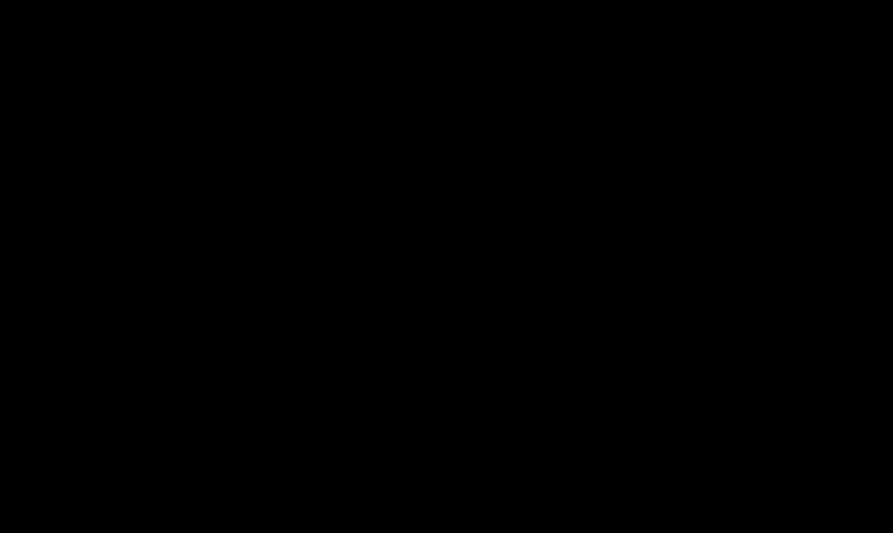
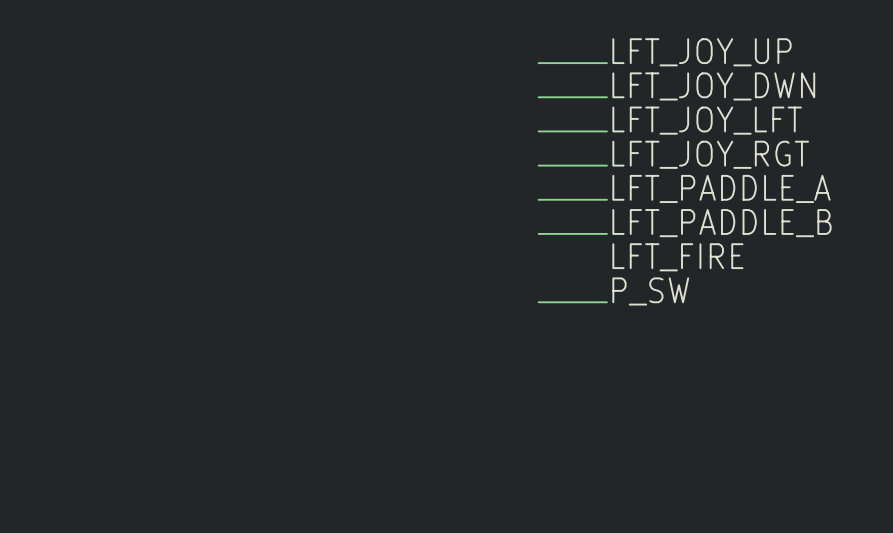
label: none -> LFT_JOY_UP (701, 52)
wire: none -> (538, 63) (606, 63)
label: none -> LFT_JOY_DWN (713, 86)
wire: none -> (538, 97) (606, 97)
label: none -> LFT_JOY_LFT (707, 120)
wire: none -> (538, 131) (606, 131)
label: none -> LFT_JOY_RGT (710, 154)
wire: none -> (538, 165) (606, 165)
label: none -> LFT_PADDLE_A (721, 188)
wire: none -> (538, 199) (606, 199)
label: none -> LFT_PADDLE_B (721, 223)
wire: none -> (538, 233) (606, 233)
label: none -> LFT_FIRE (677, 257)
label: none -> P_SW (650, 291)
wire: none -> (538, 302) (606, 302)

